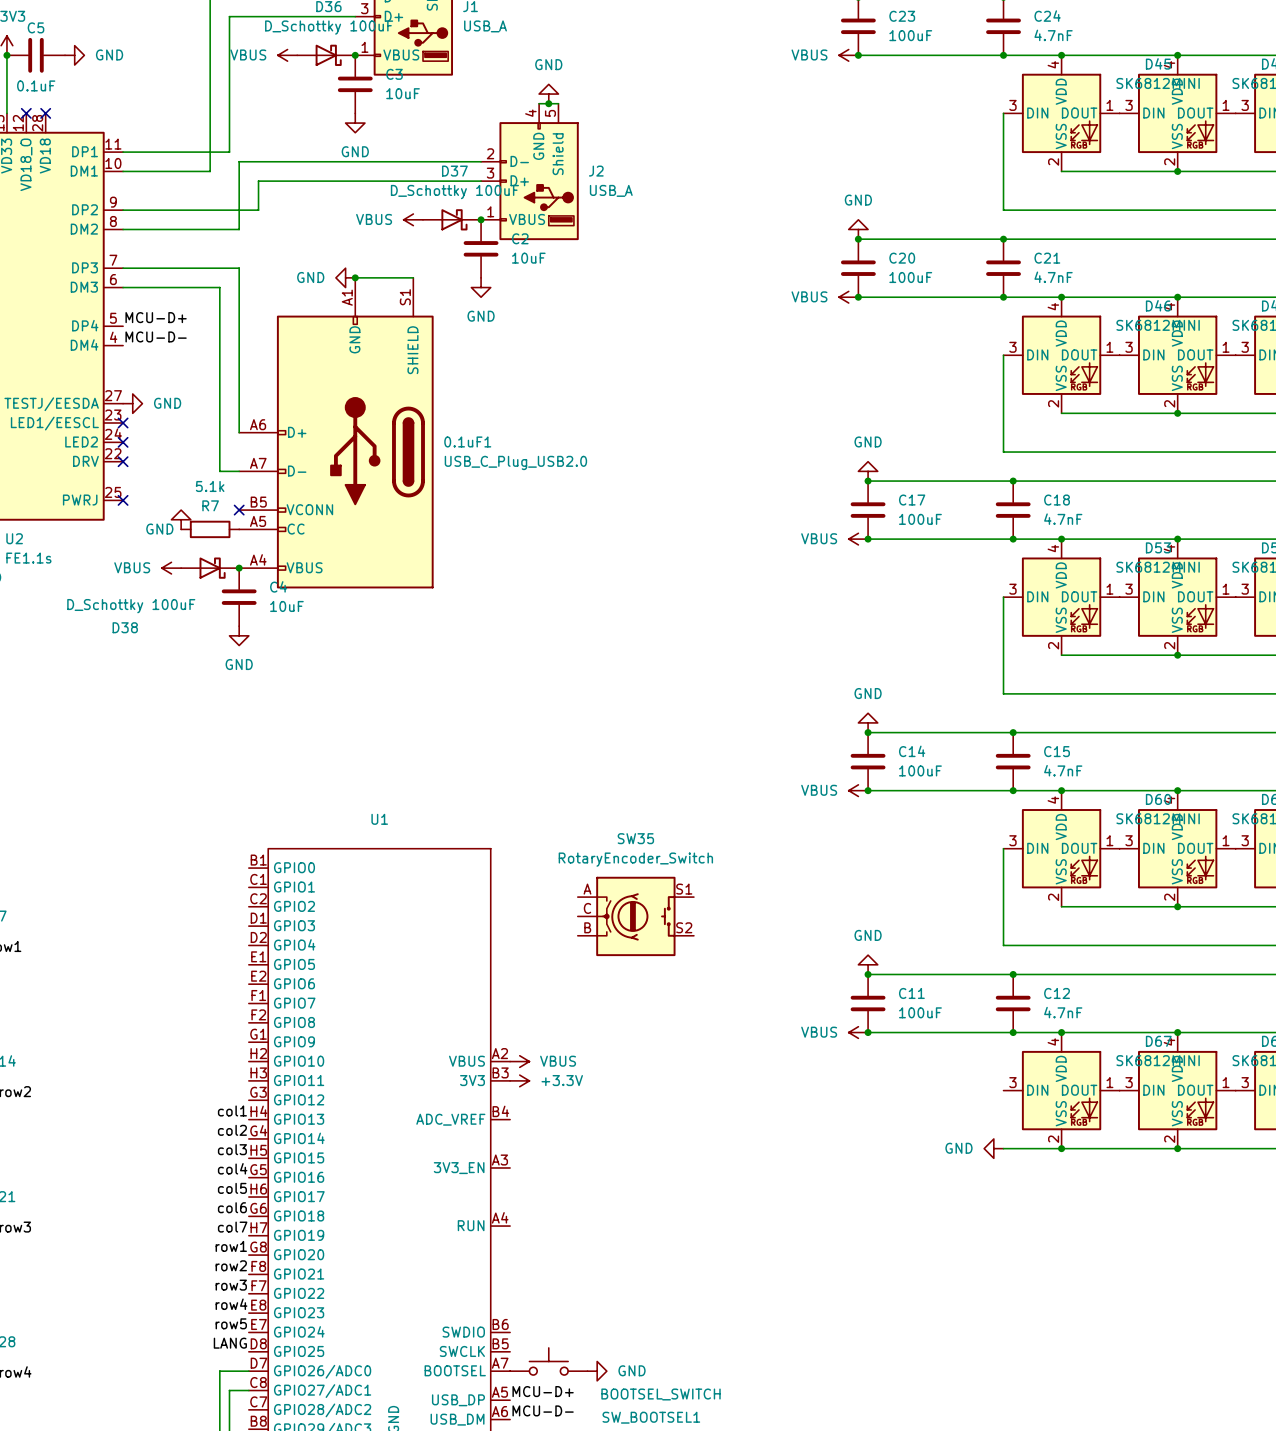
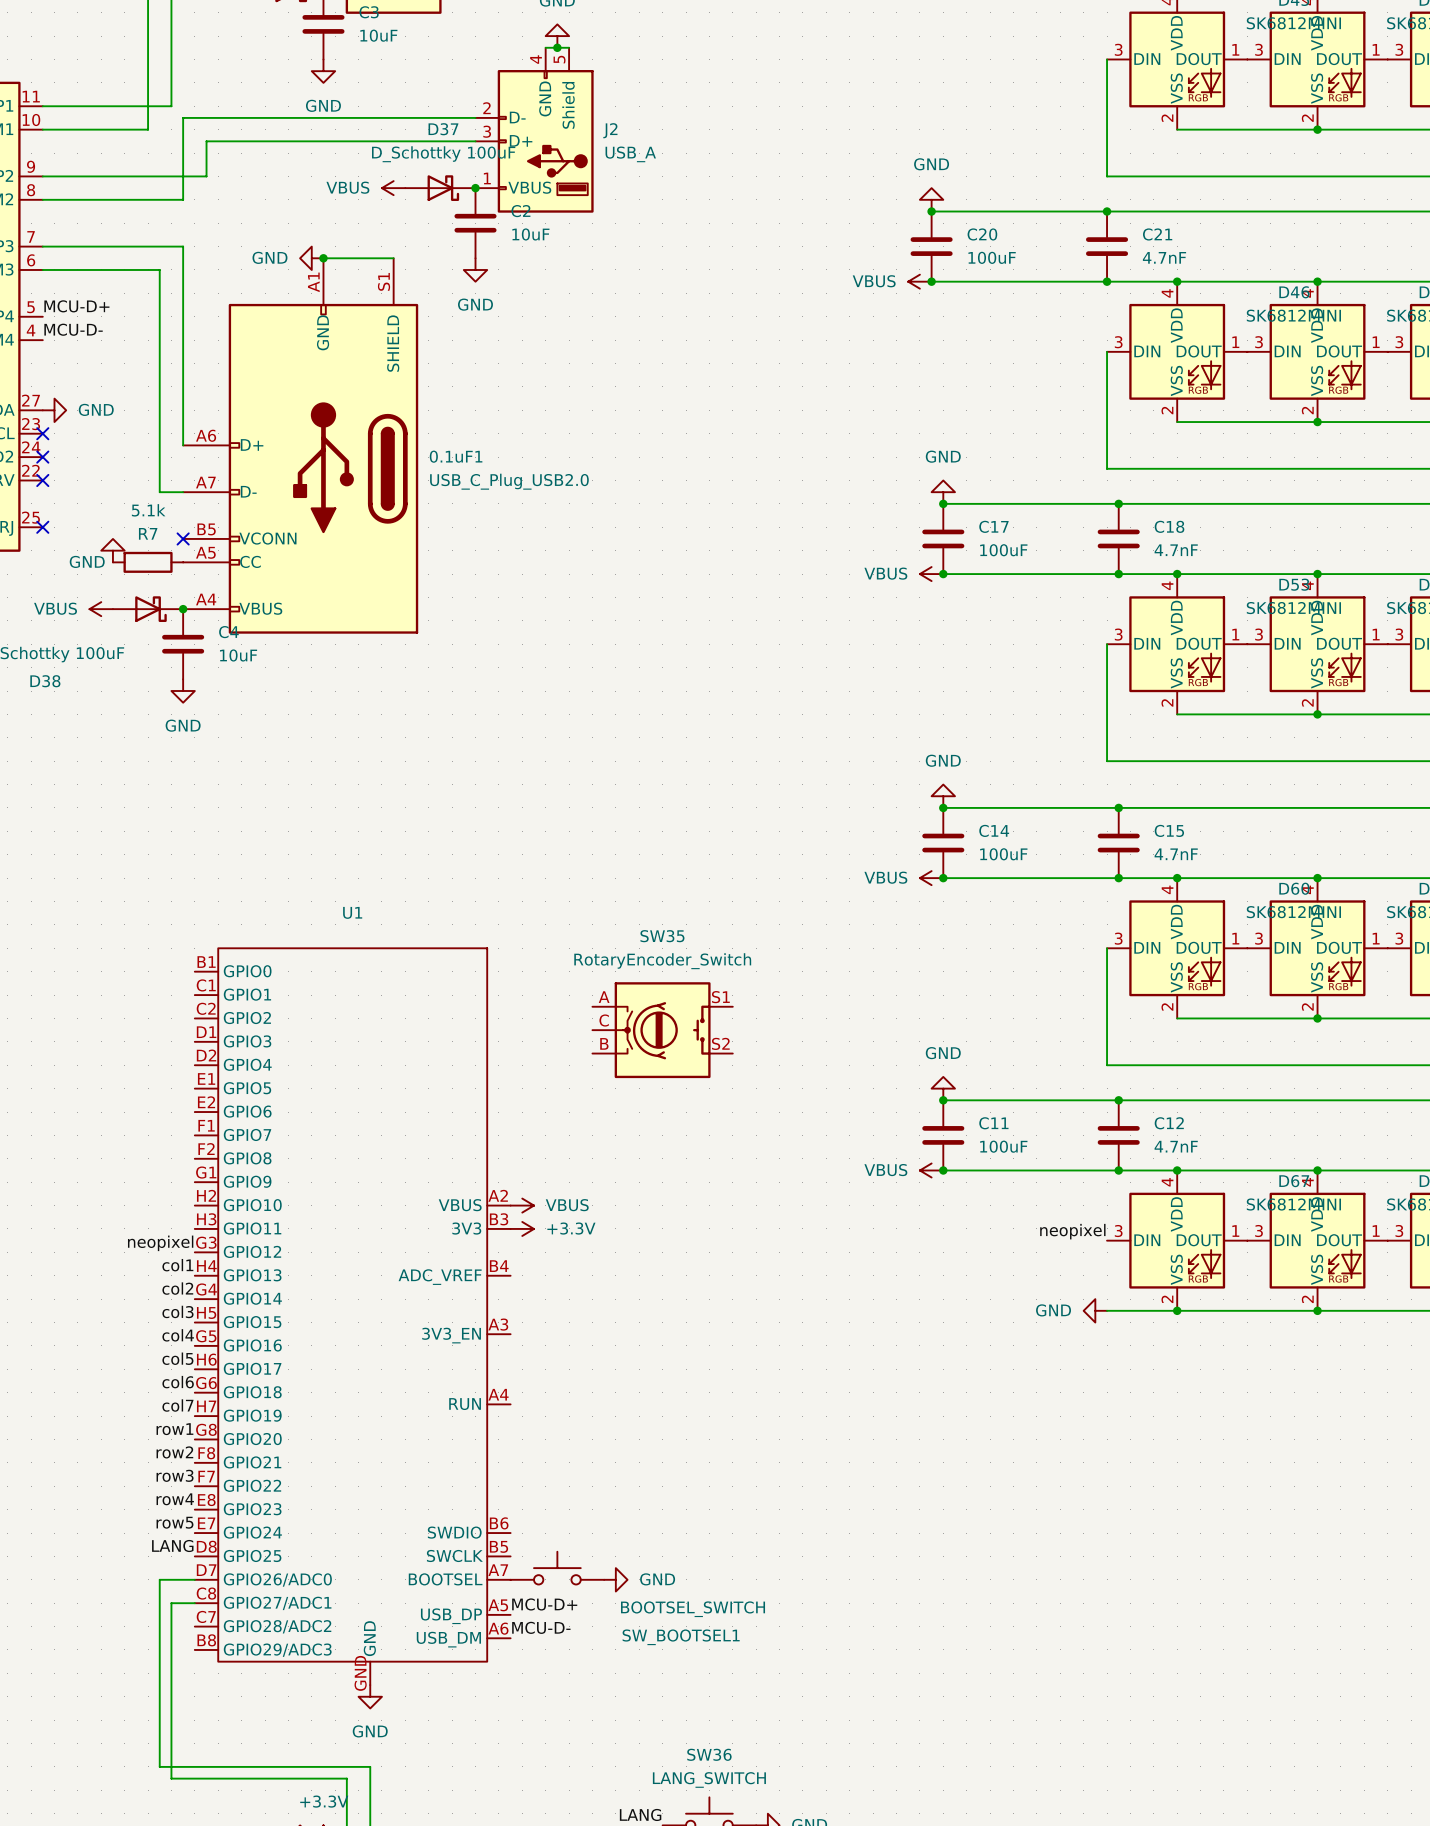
label: none -> neopixel (1072, 1231)
label: none -> neopixel (160, 1243)

